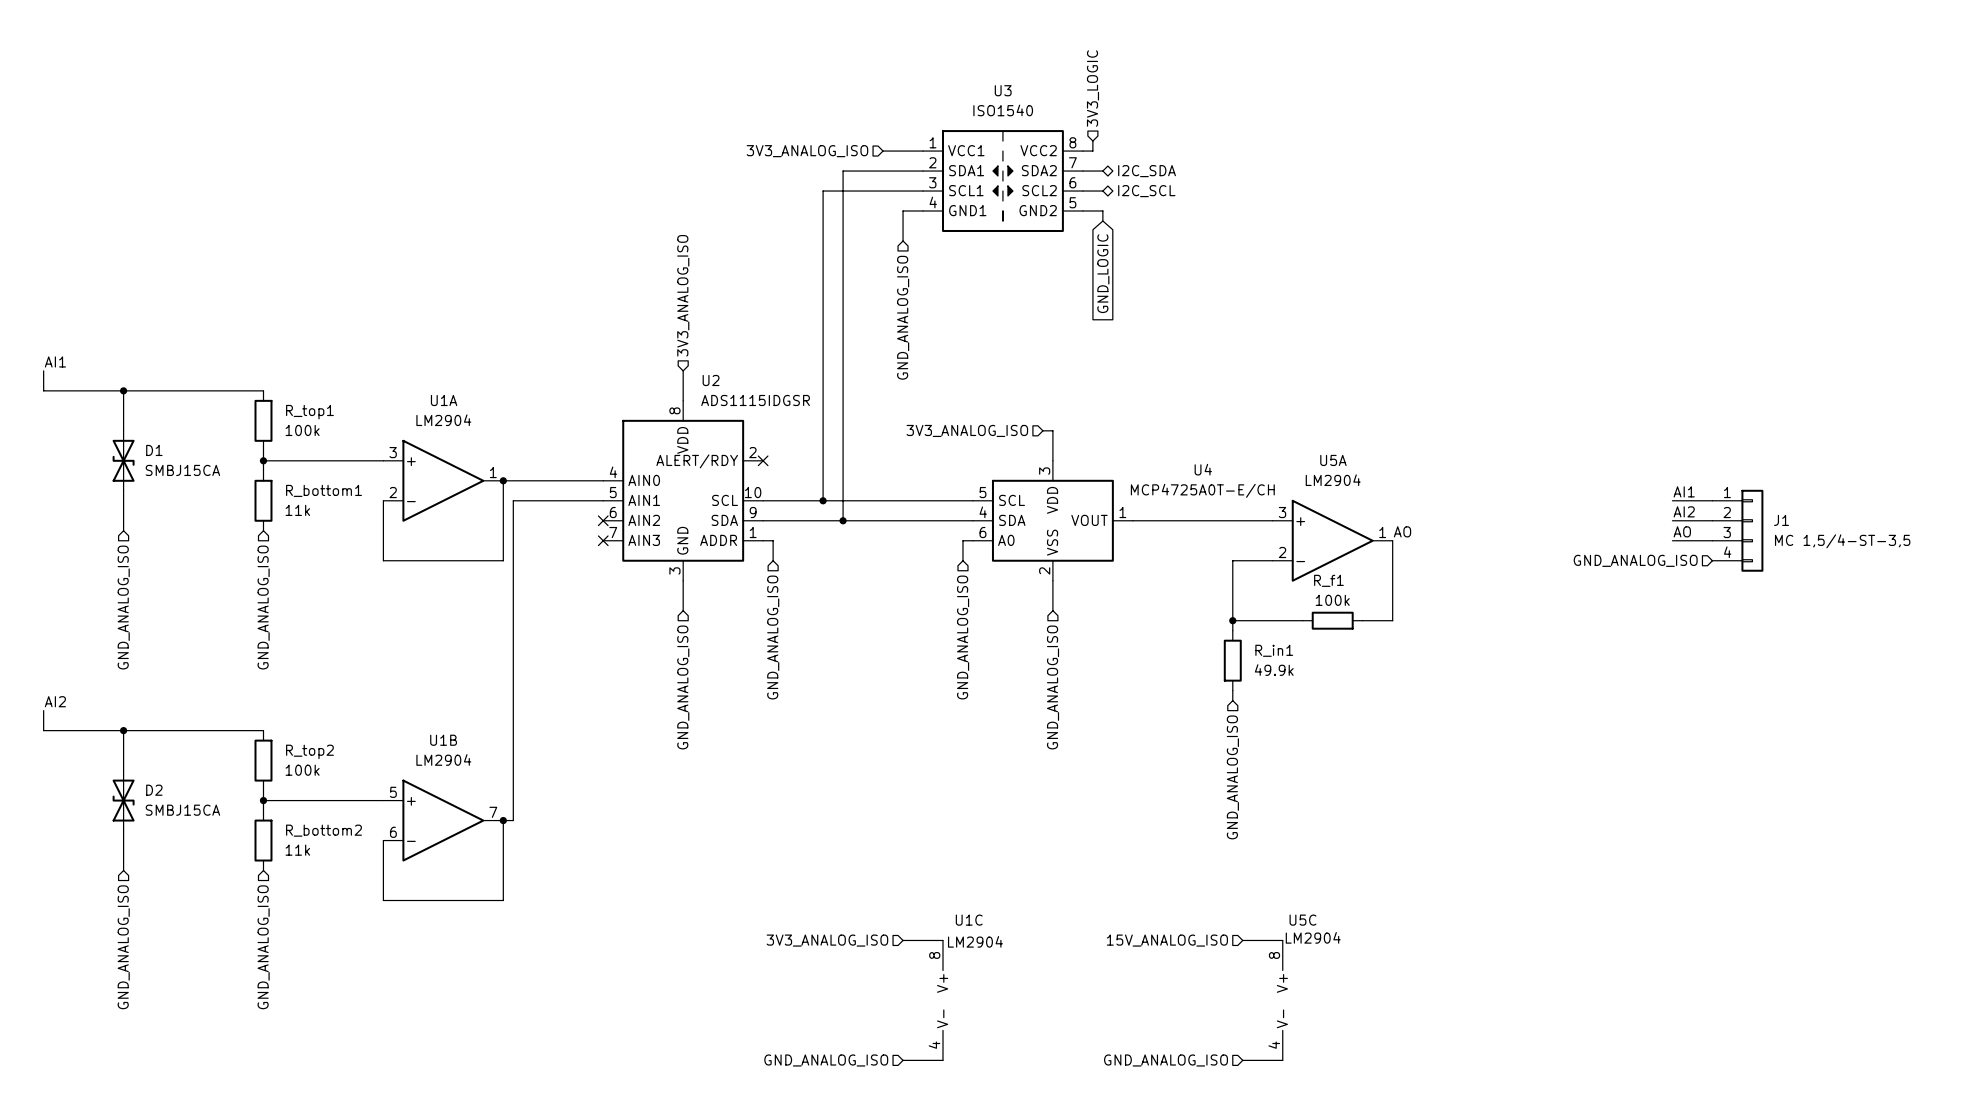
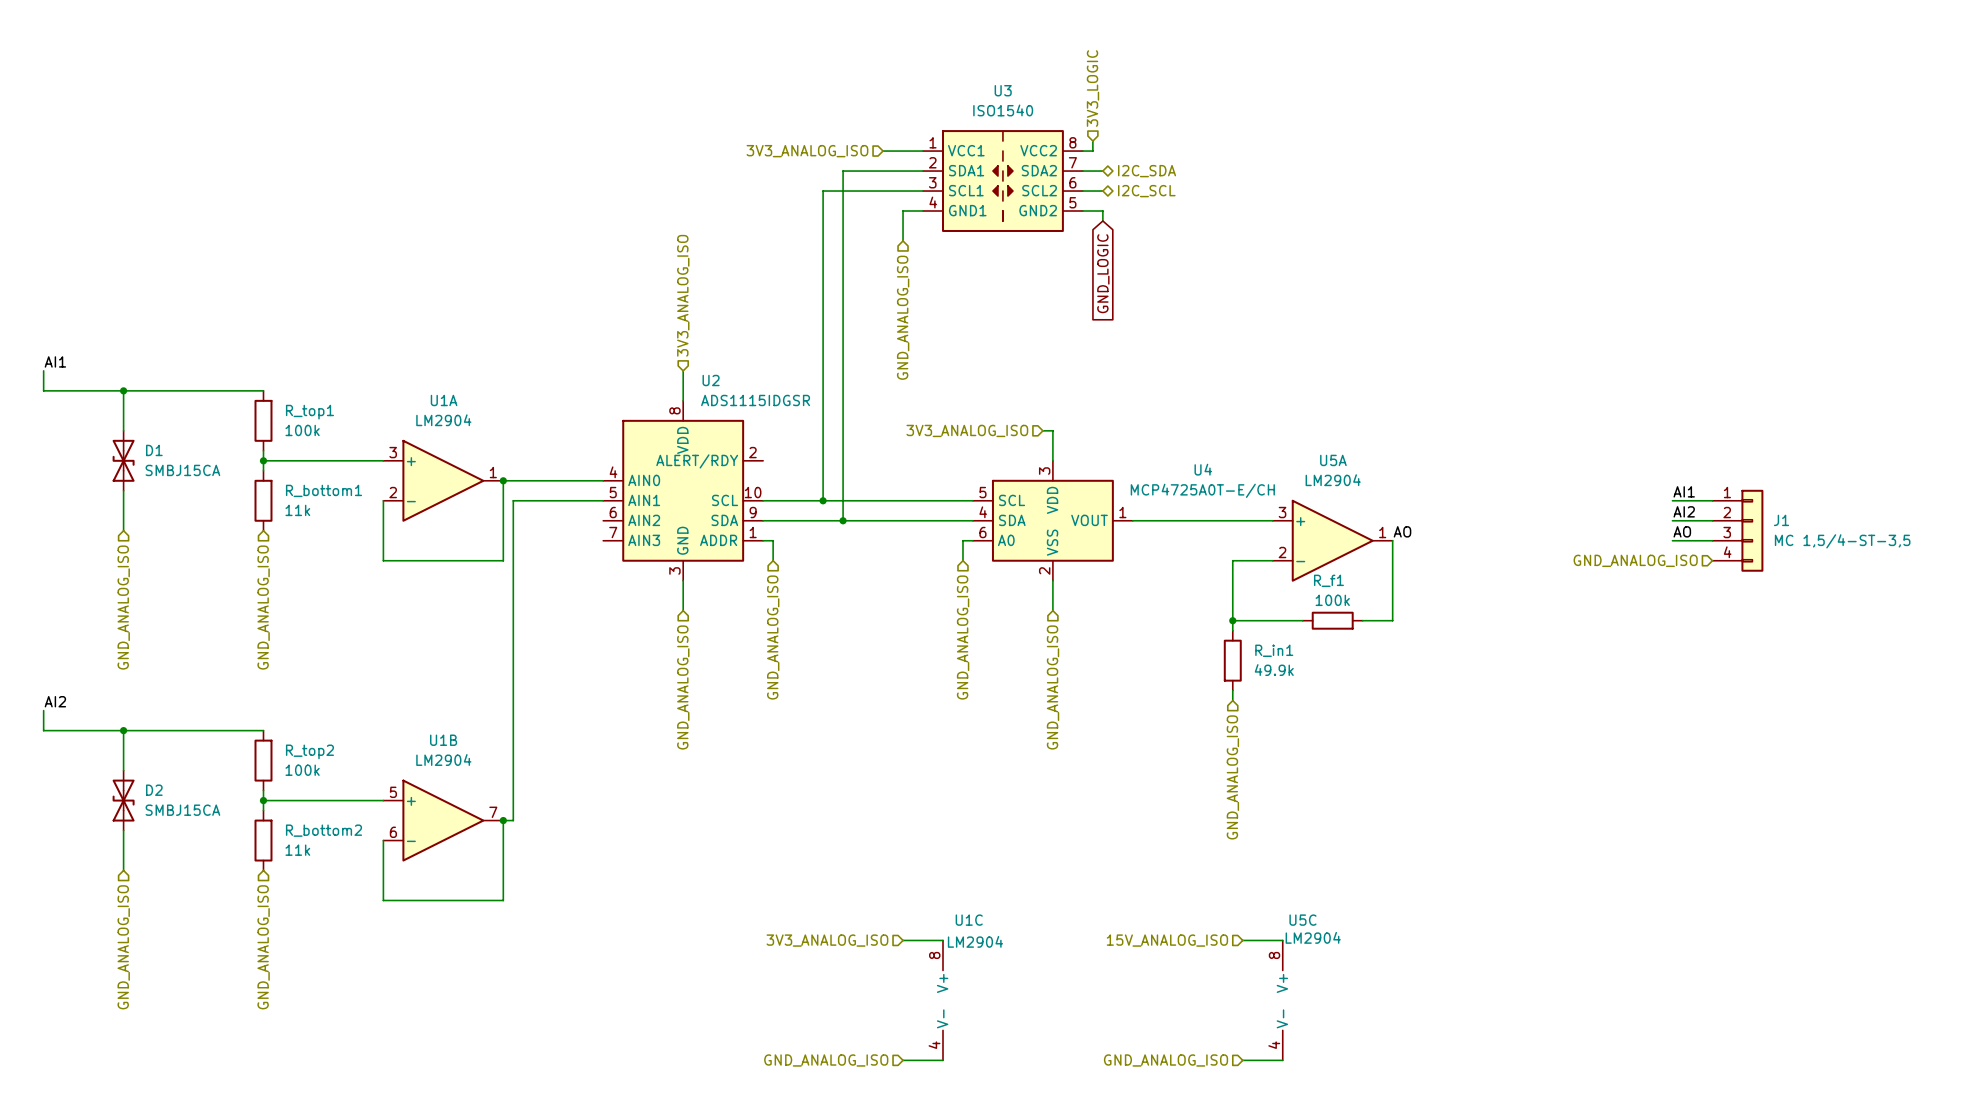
no-connect mark: (763, 460) -> none
no-connect mark: (603, 520) -> none
no-connect mark: (603, 540) -> none

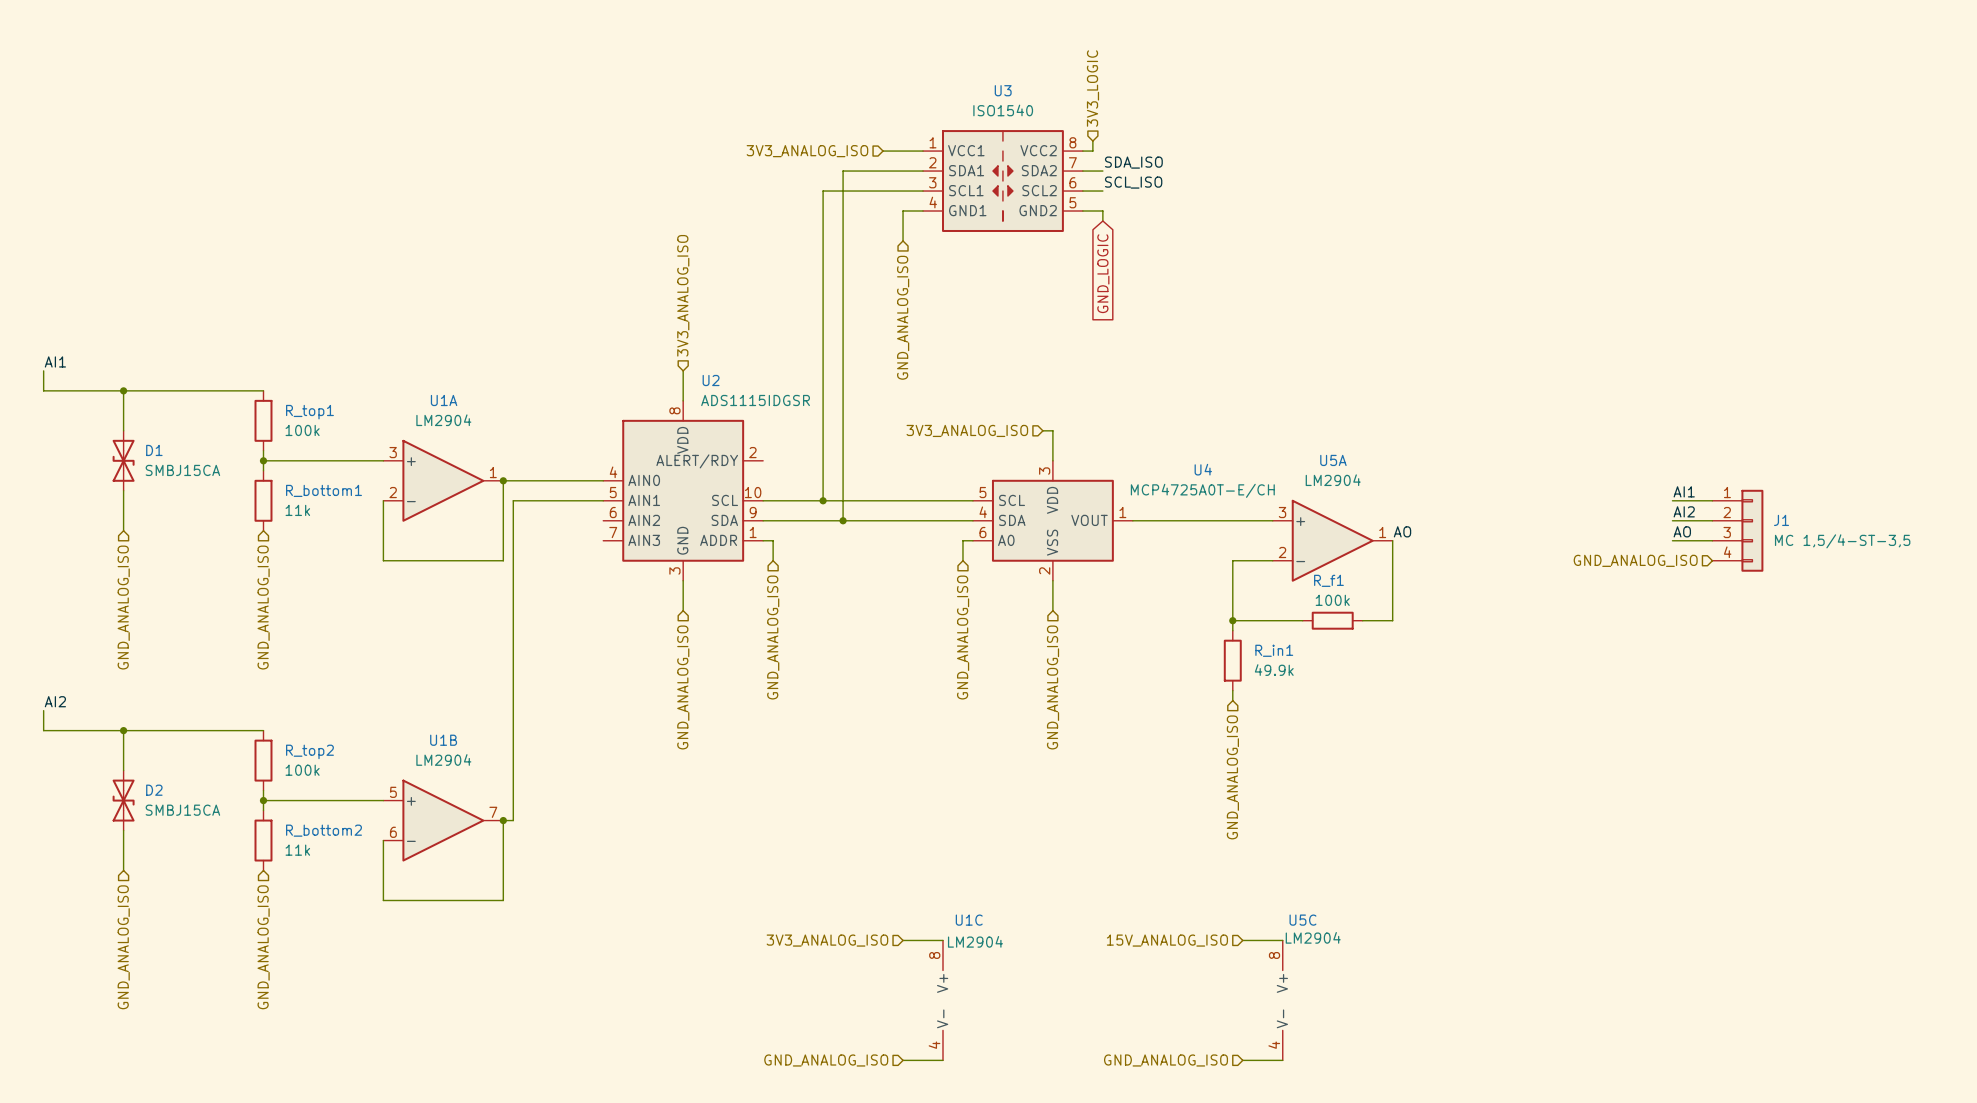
label: none -> SDA_ISO (1133, 162)
hierarchical label: I2C_SDA (1147, 171) -> none
label: none -> SCL_ISO (1133, 182)
hierarchical label: I2C_SCL (1146, 191) -> none

